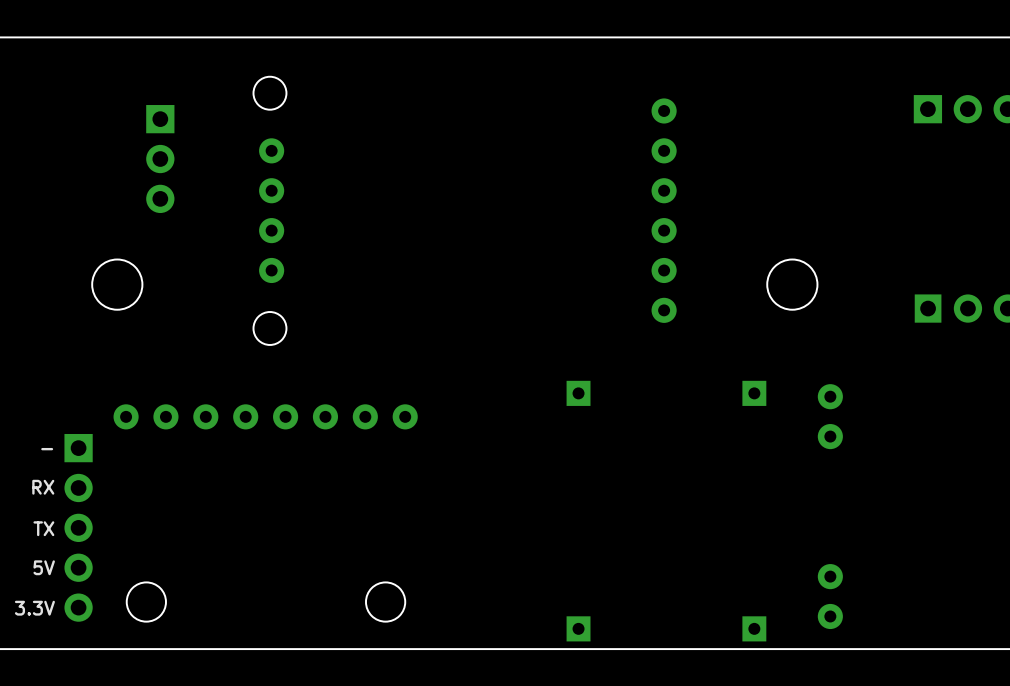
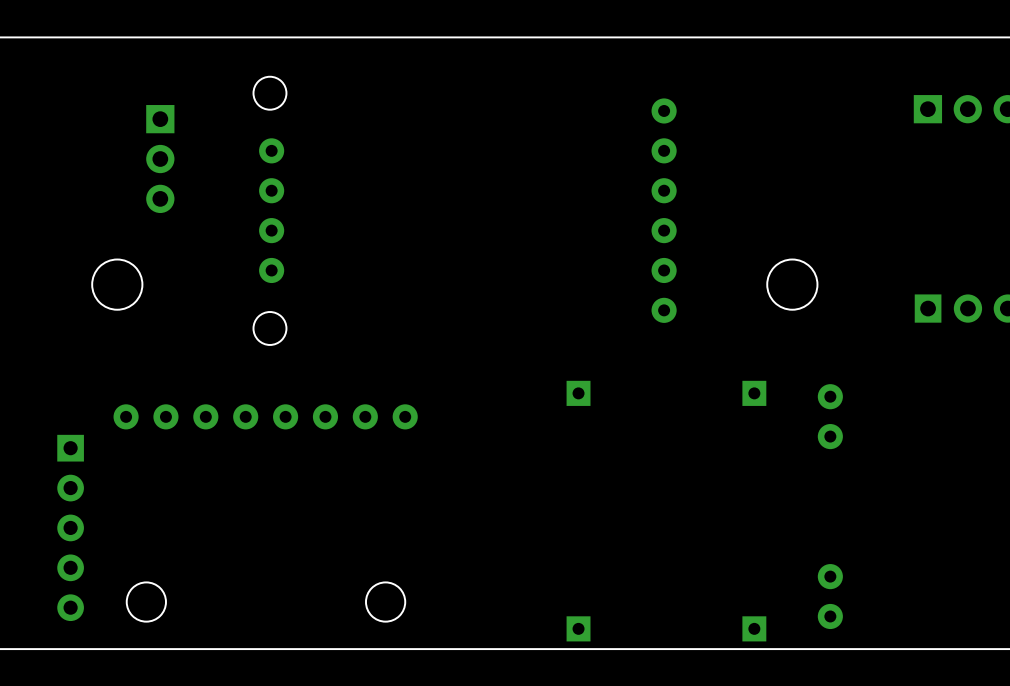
part footprint: [64, 433, 93, 622] -> [57, 434, 84, 622]
text: - (47, 449) -> none
text: RX (43, 487) -> none
text: TX (43, 528) -> none
text: 5V (44, 567) -> none
text: 3.3V (34, 608) -> none

